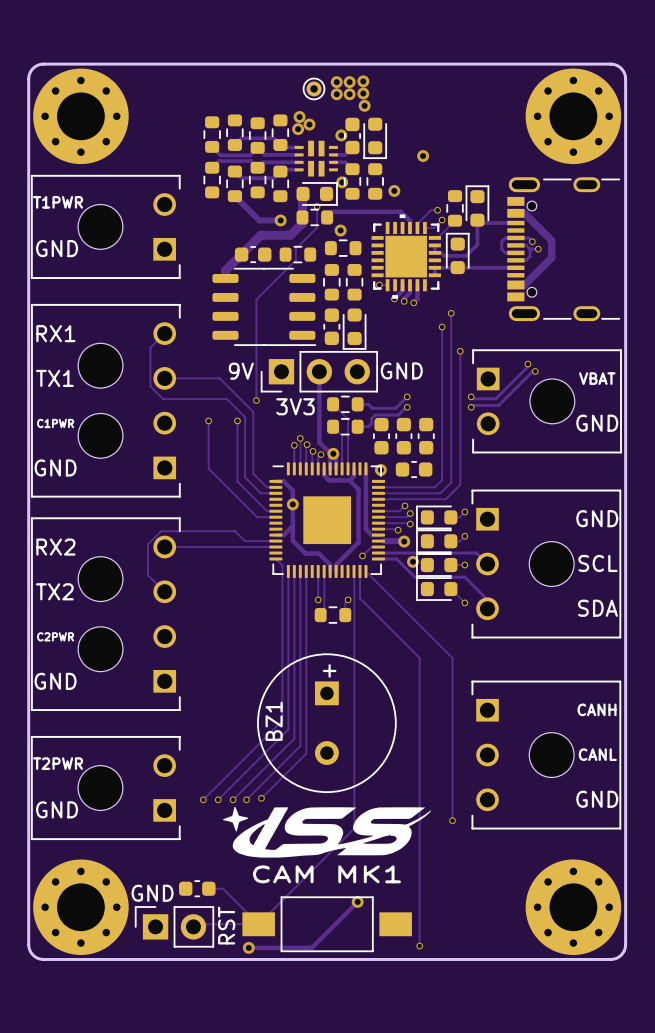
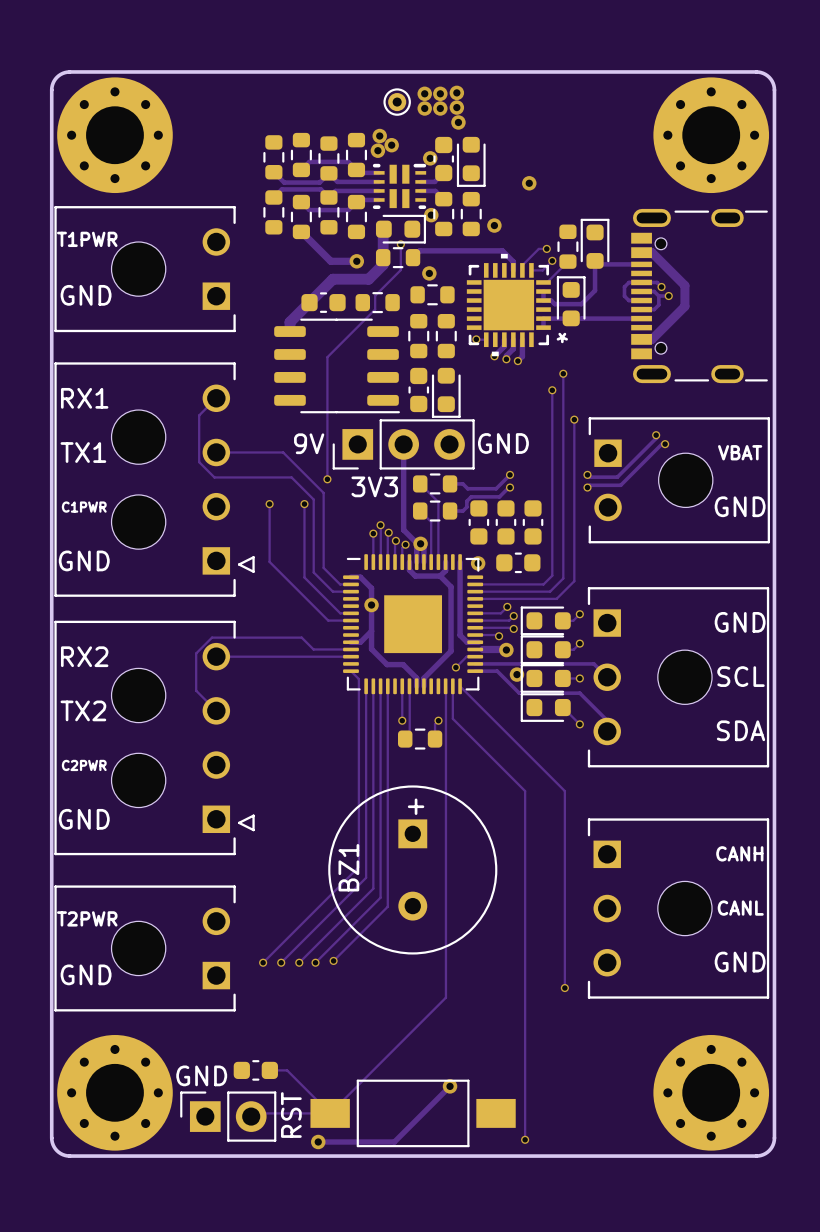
part footprint: [294, 140, 338, 177] -> [372, 163, 427, 210]
part text: none -> * (562, 337)
part footprint: [30, 303, 181, 498] -> [54, 362, 255, 597]
part footprint: [30, 517, 181, 711] -> [54, 620, 255, 856]
drawing: [222, 806, 432, 858] -> none
text: CAM MK1 (326, 874) -> none

